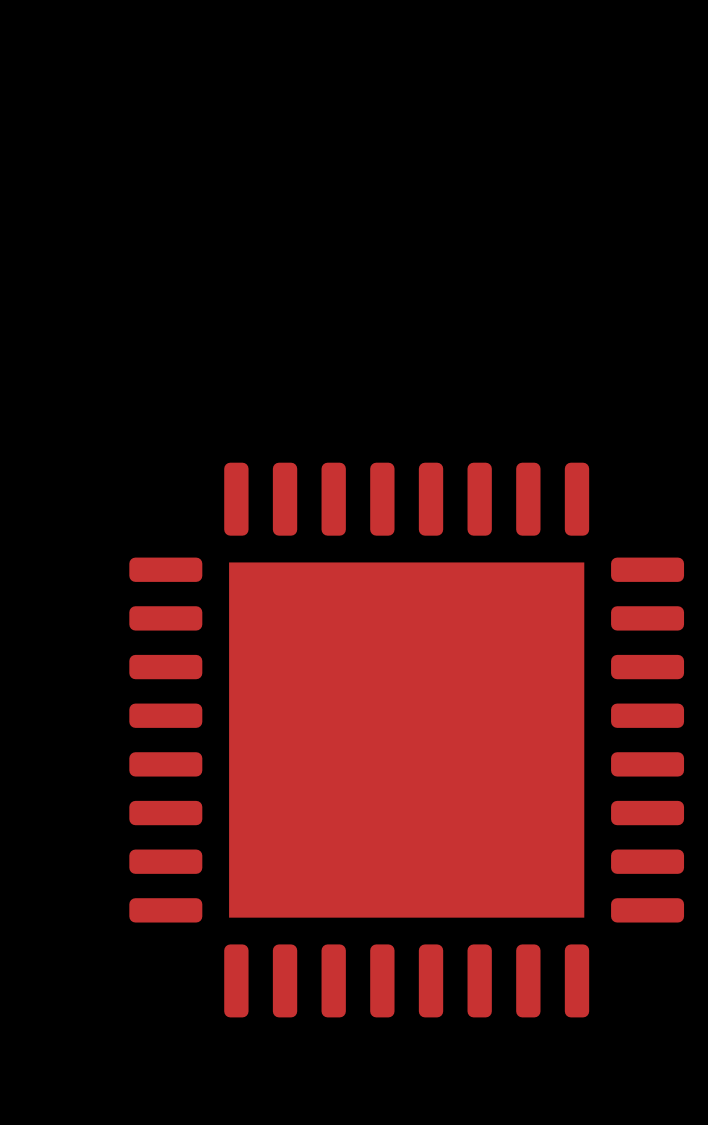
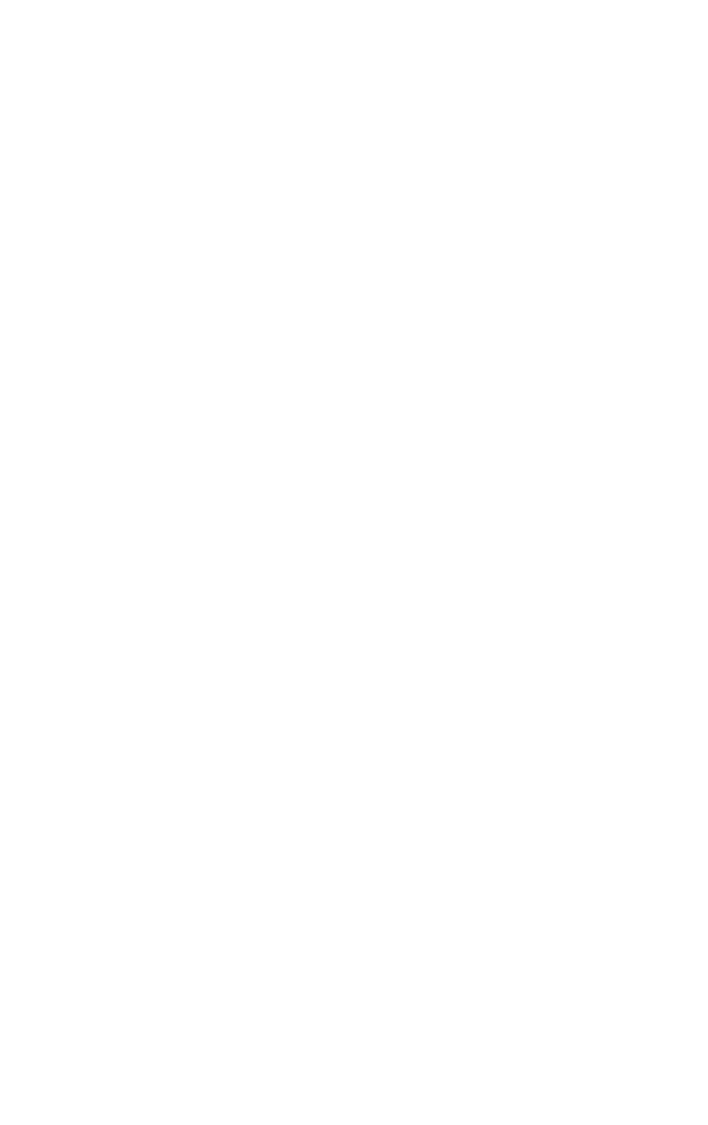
part: (406, 740) -> none

